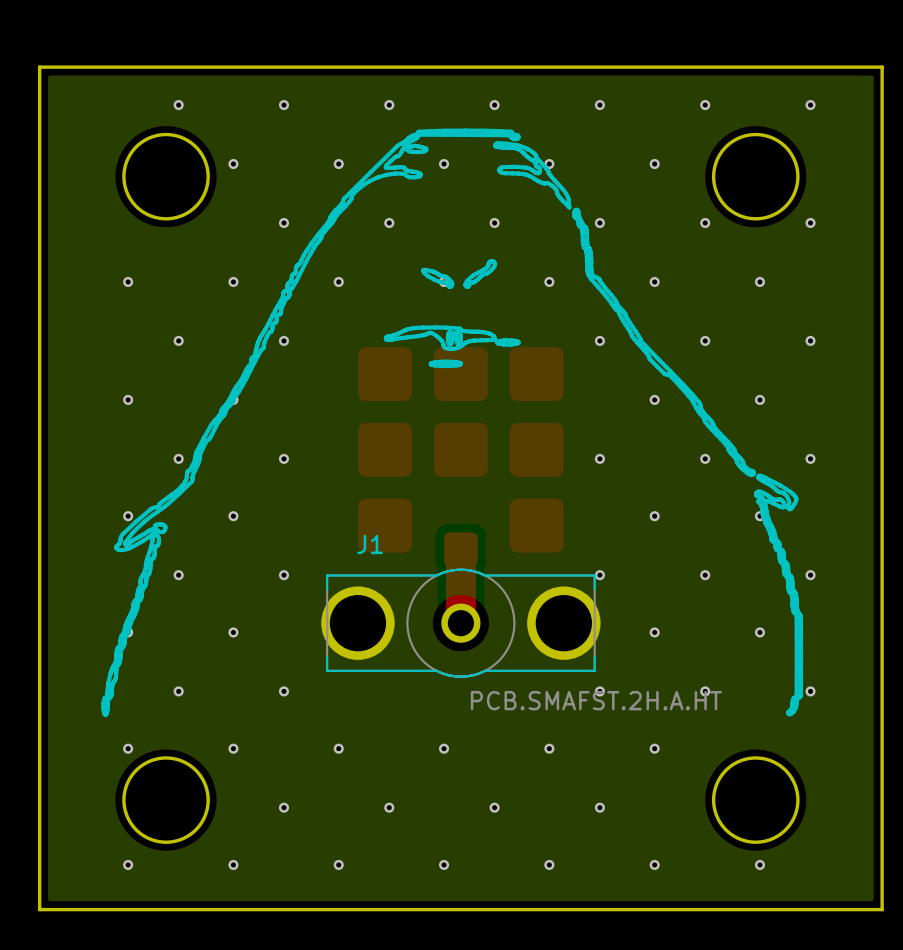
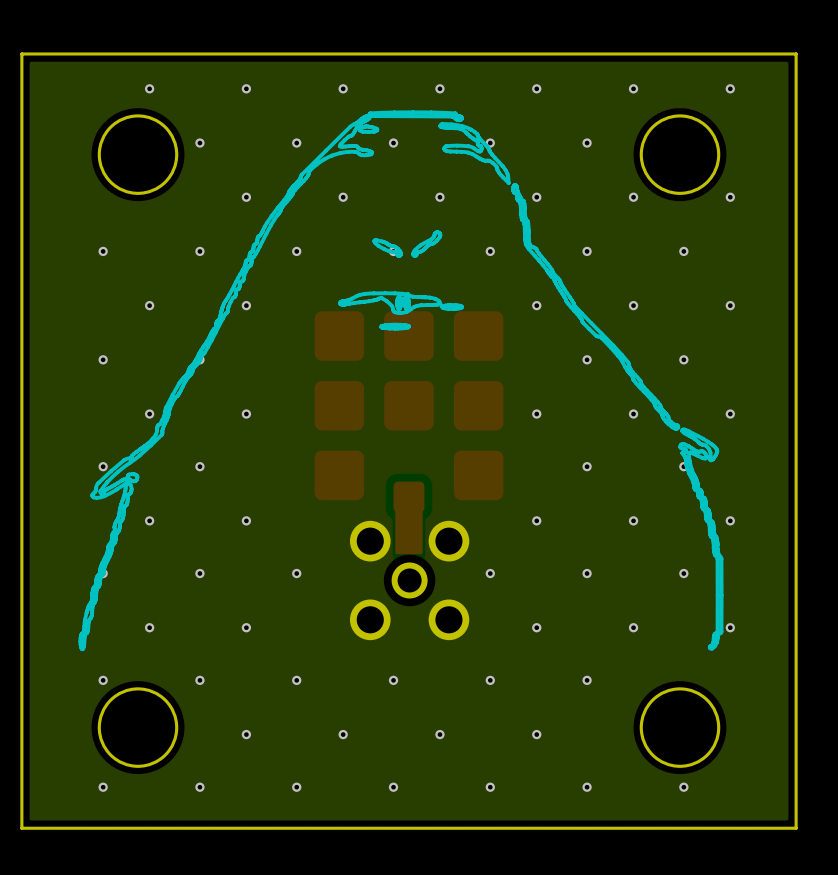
J1: PCB.SMAFST.2H.A.HT (460, 623) -> none
via: none -> (296, 573)
via: none -> (490, 573)
part: none -> (409, 580)

